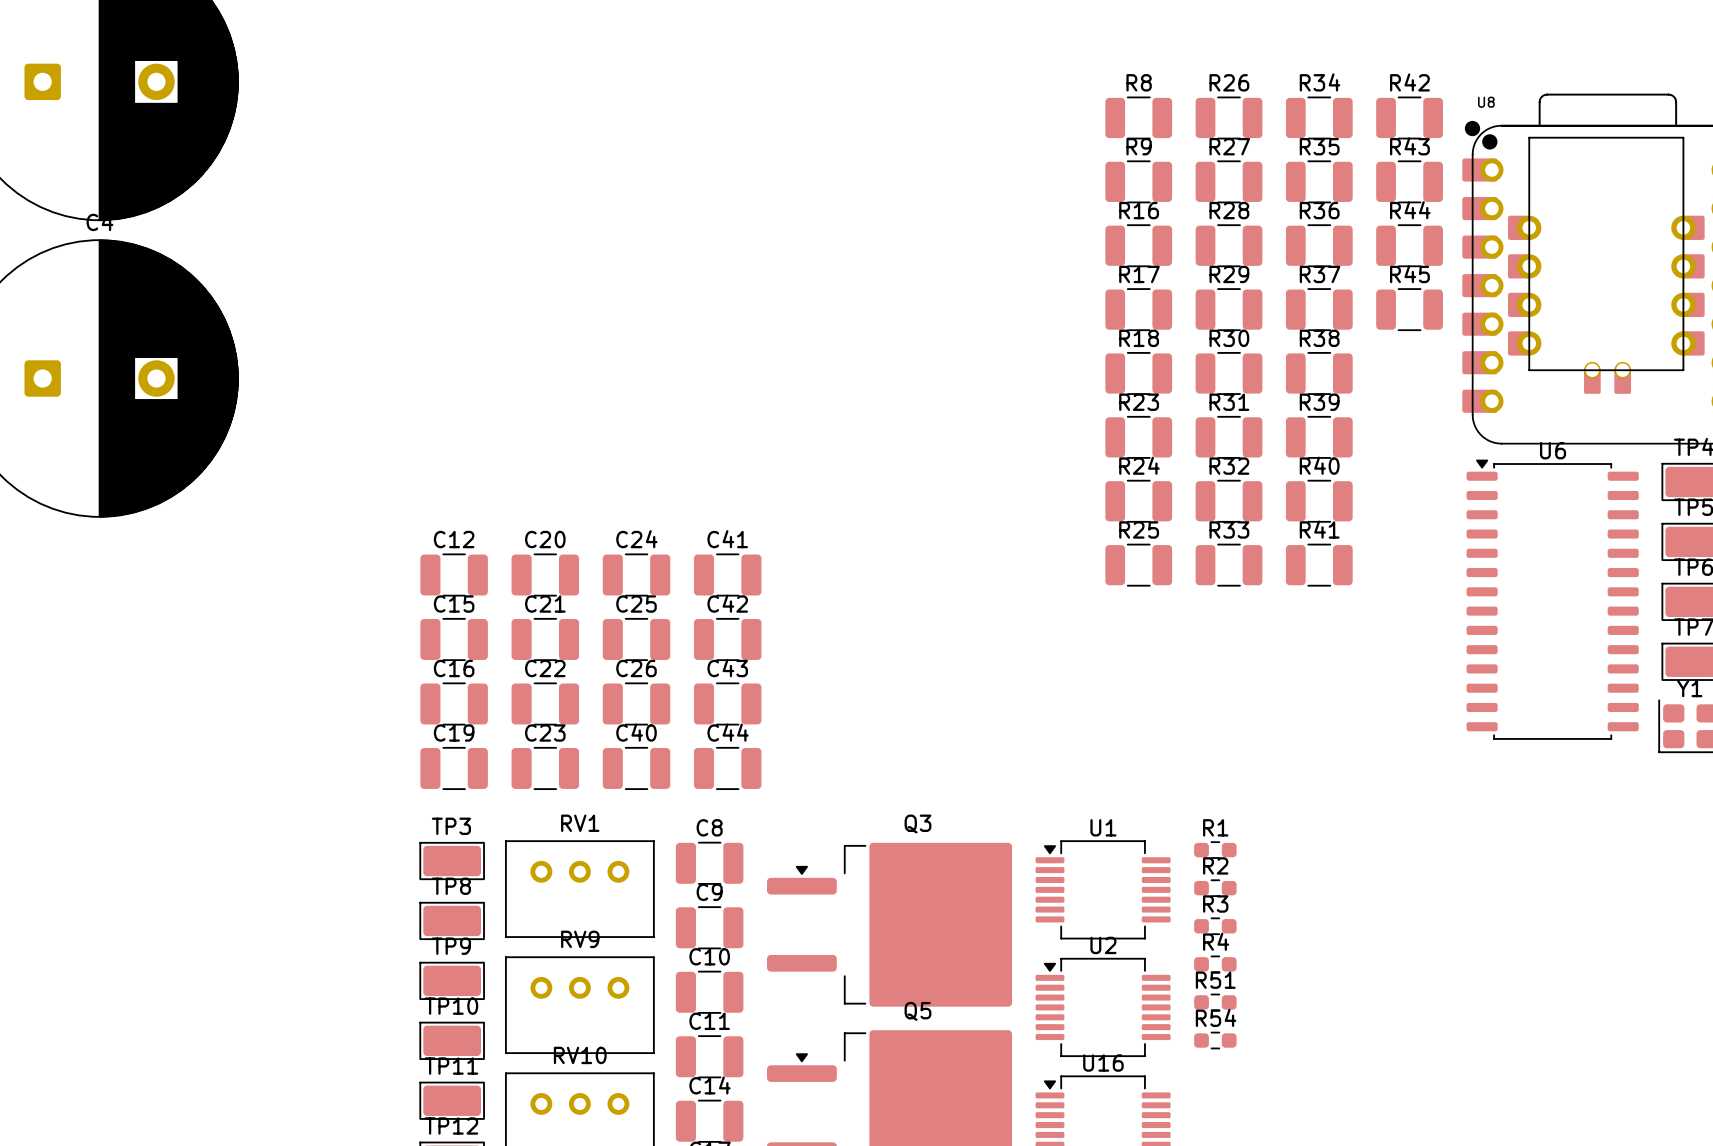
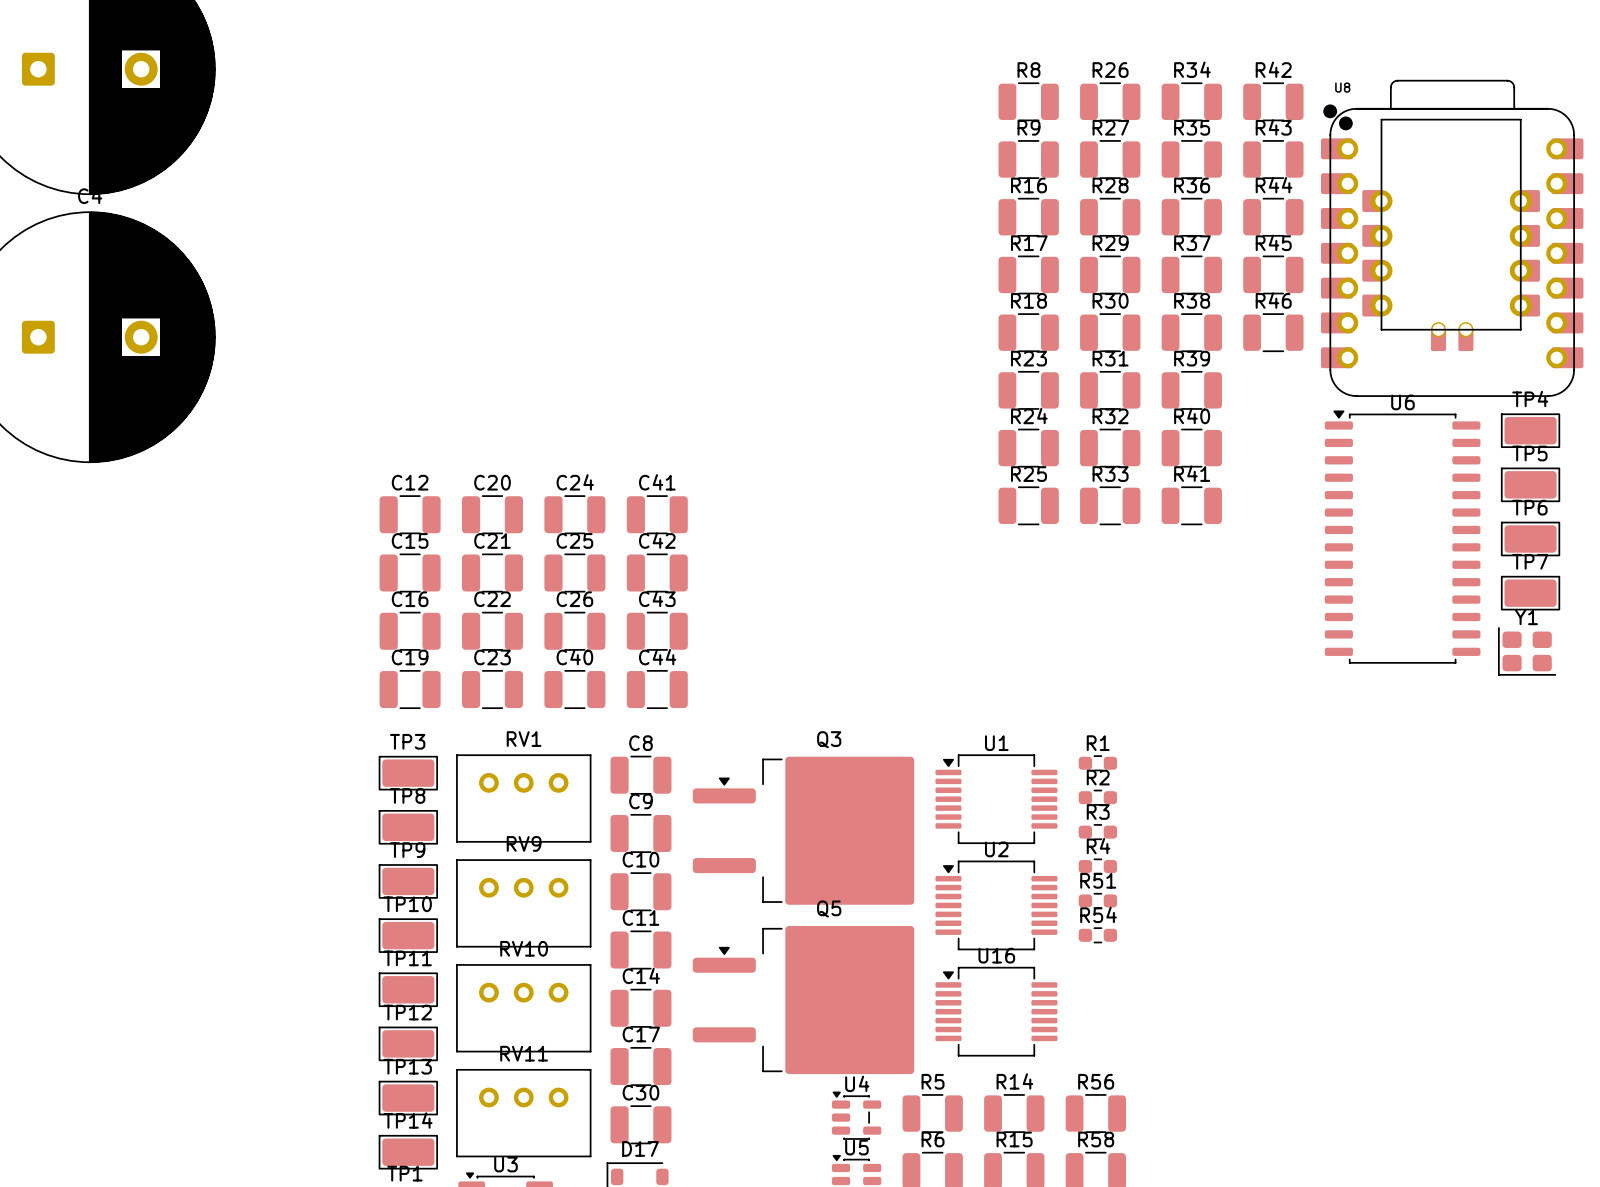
R46: none -> (1273, 332)

